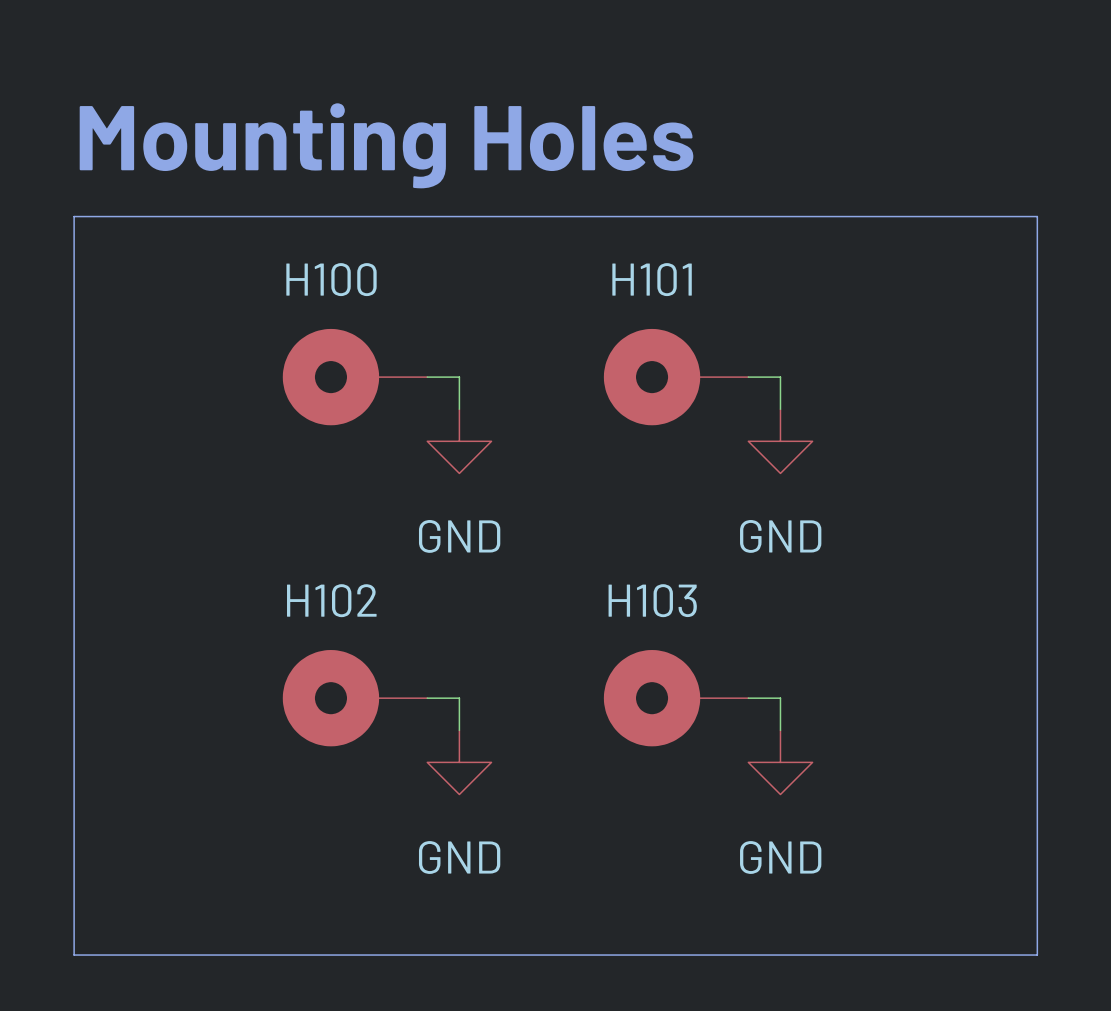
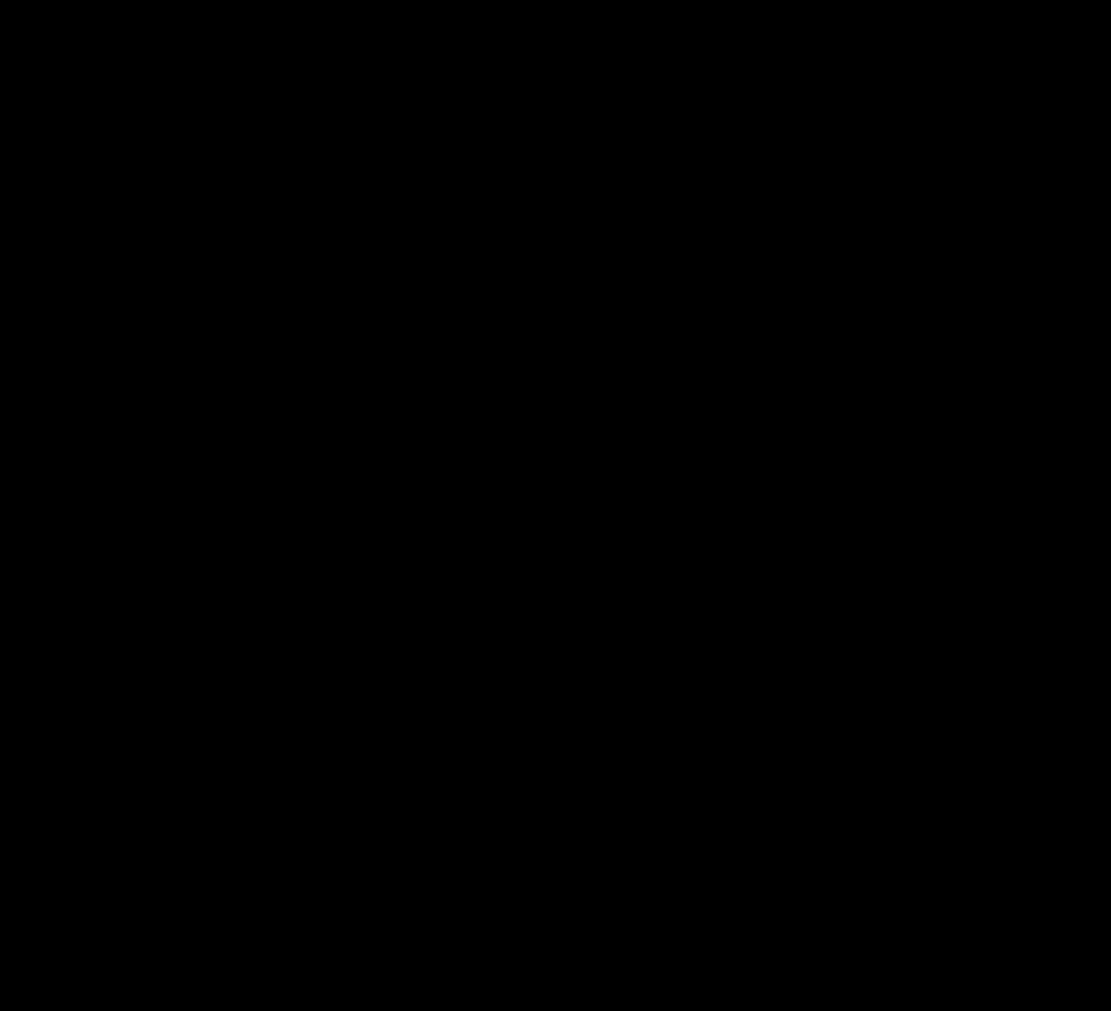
text: Mounting Holes (386, 145) -> none
line: (74, 216) (1037, 216) (1037, 955) (74, 955) (74, 216) -> none
H100: (355, 377) -> none
wire: (427, 377) (459, 377) (459, 409) -> none
H101: (676, 377) -> none
wire: (748, 377) (780, 377) (780, 409) -> none
power symbol: GND (459, 441) -> none
power symbol: GND (780, 441) -> none
H102: (355, 698) -> none
wire: (427, 698) (459, 698) (459, 730) -> none
H103: (676, 698) -> none
wire: (748, 698) (780, 698) (780, 730) -> none
power symbol: GND (459, 762) -> none
power symbol: GND (780, 762) -> none

